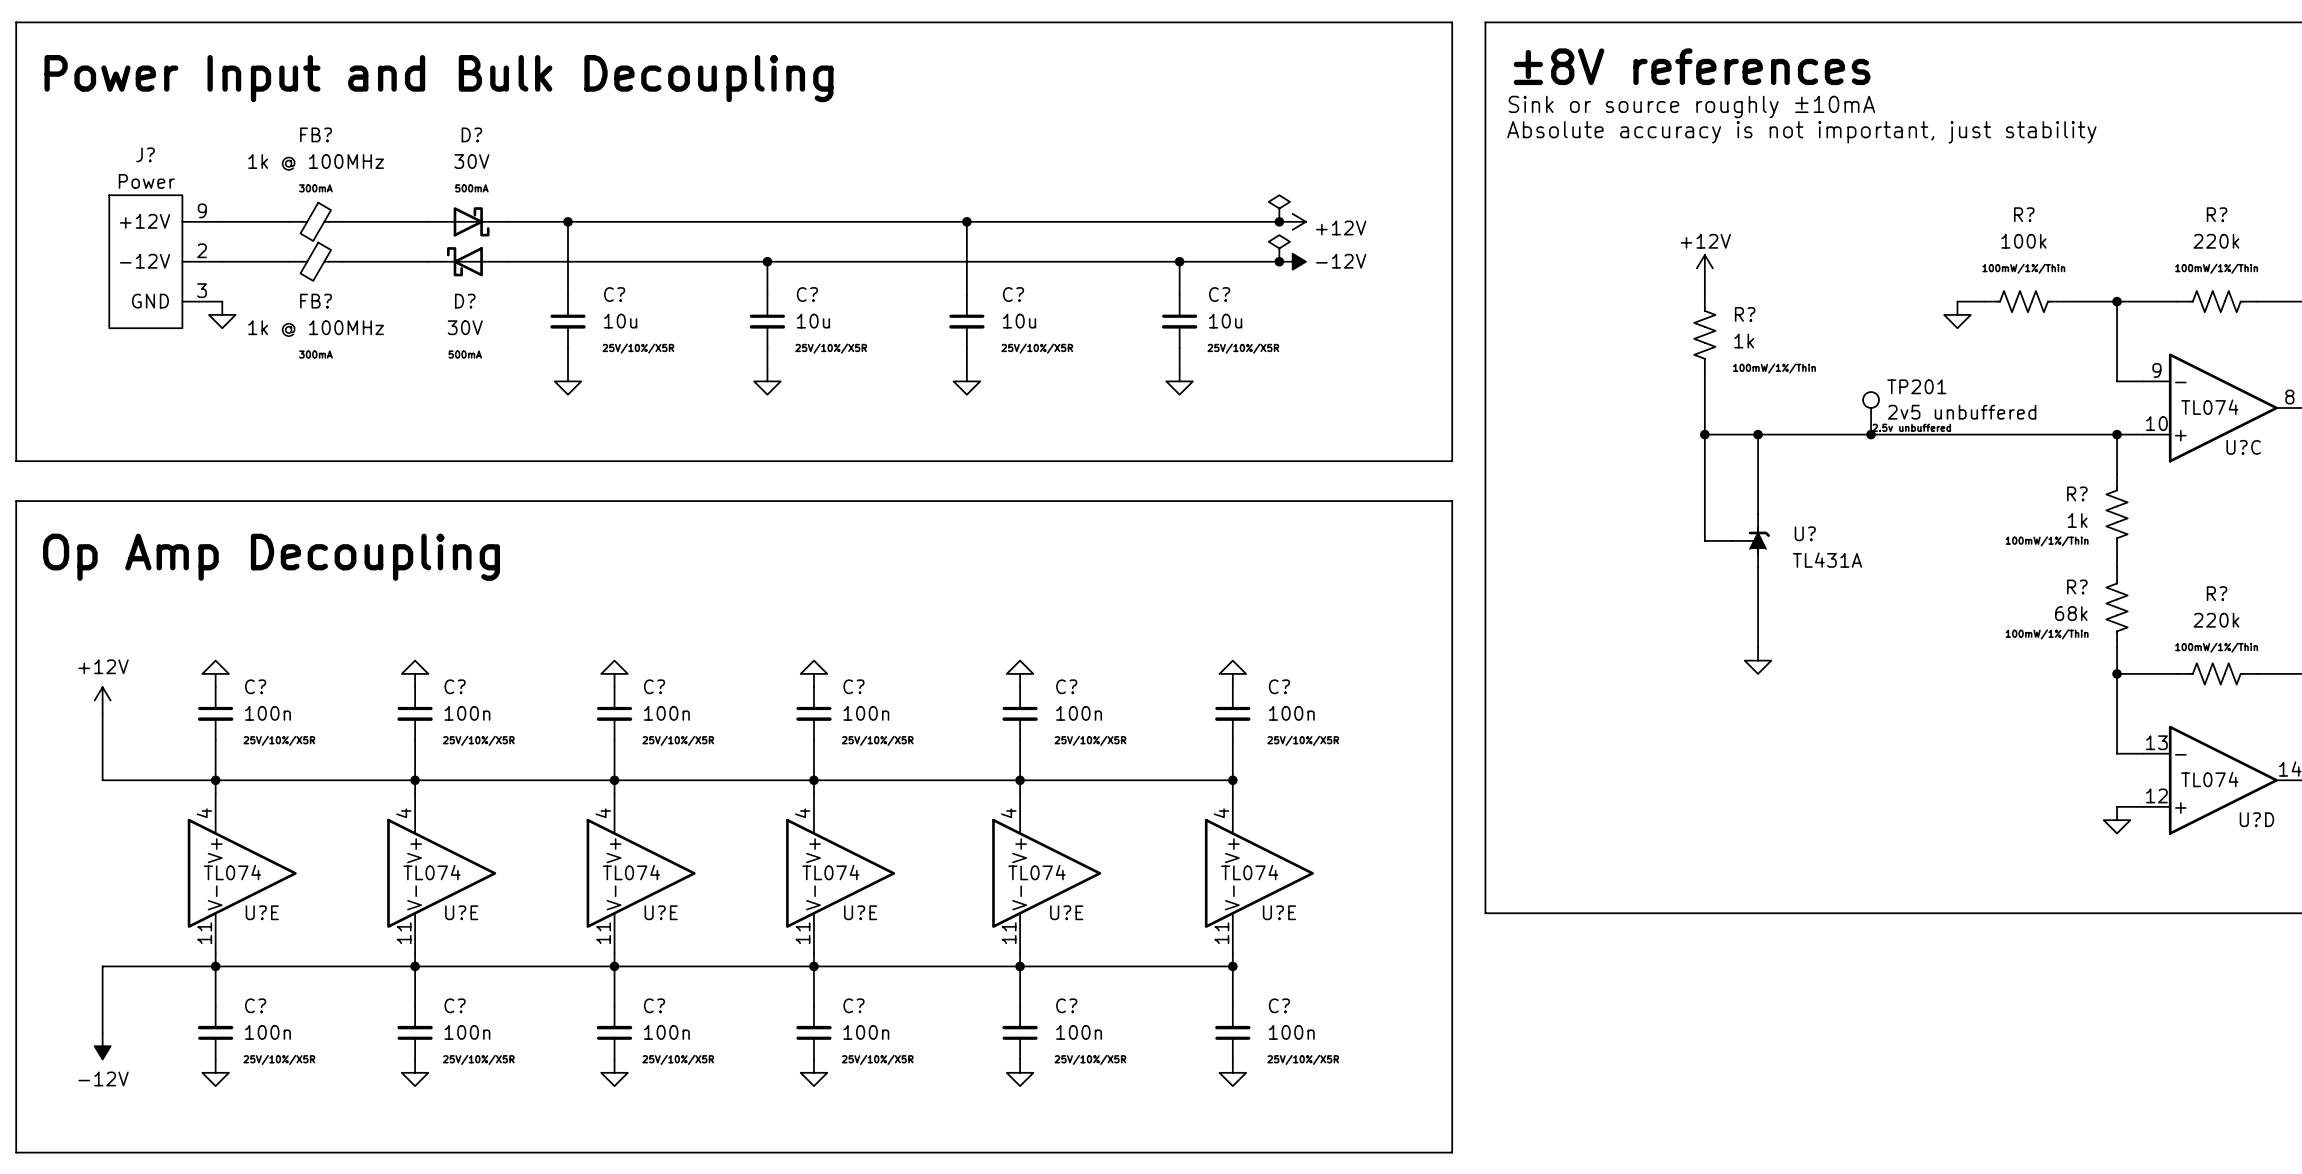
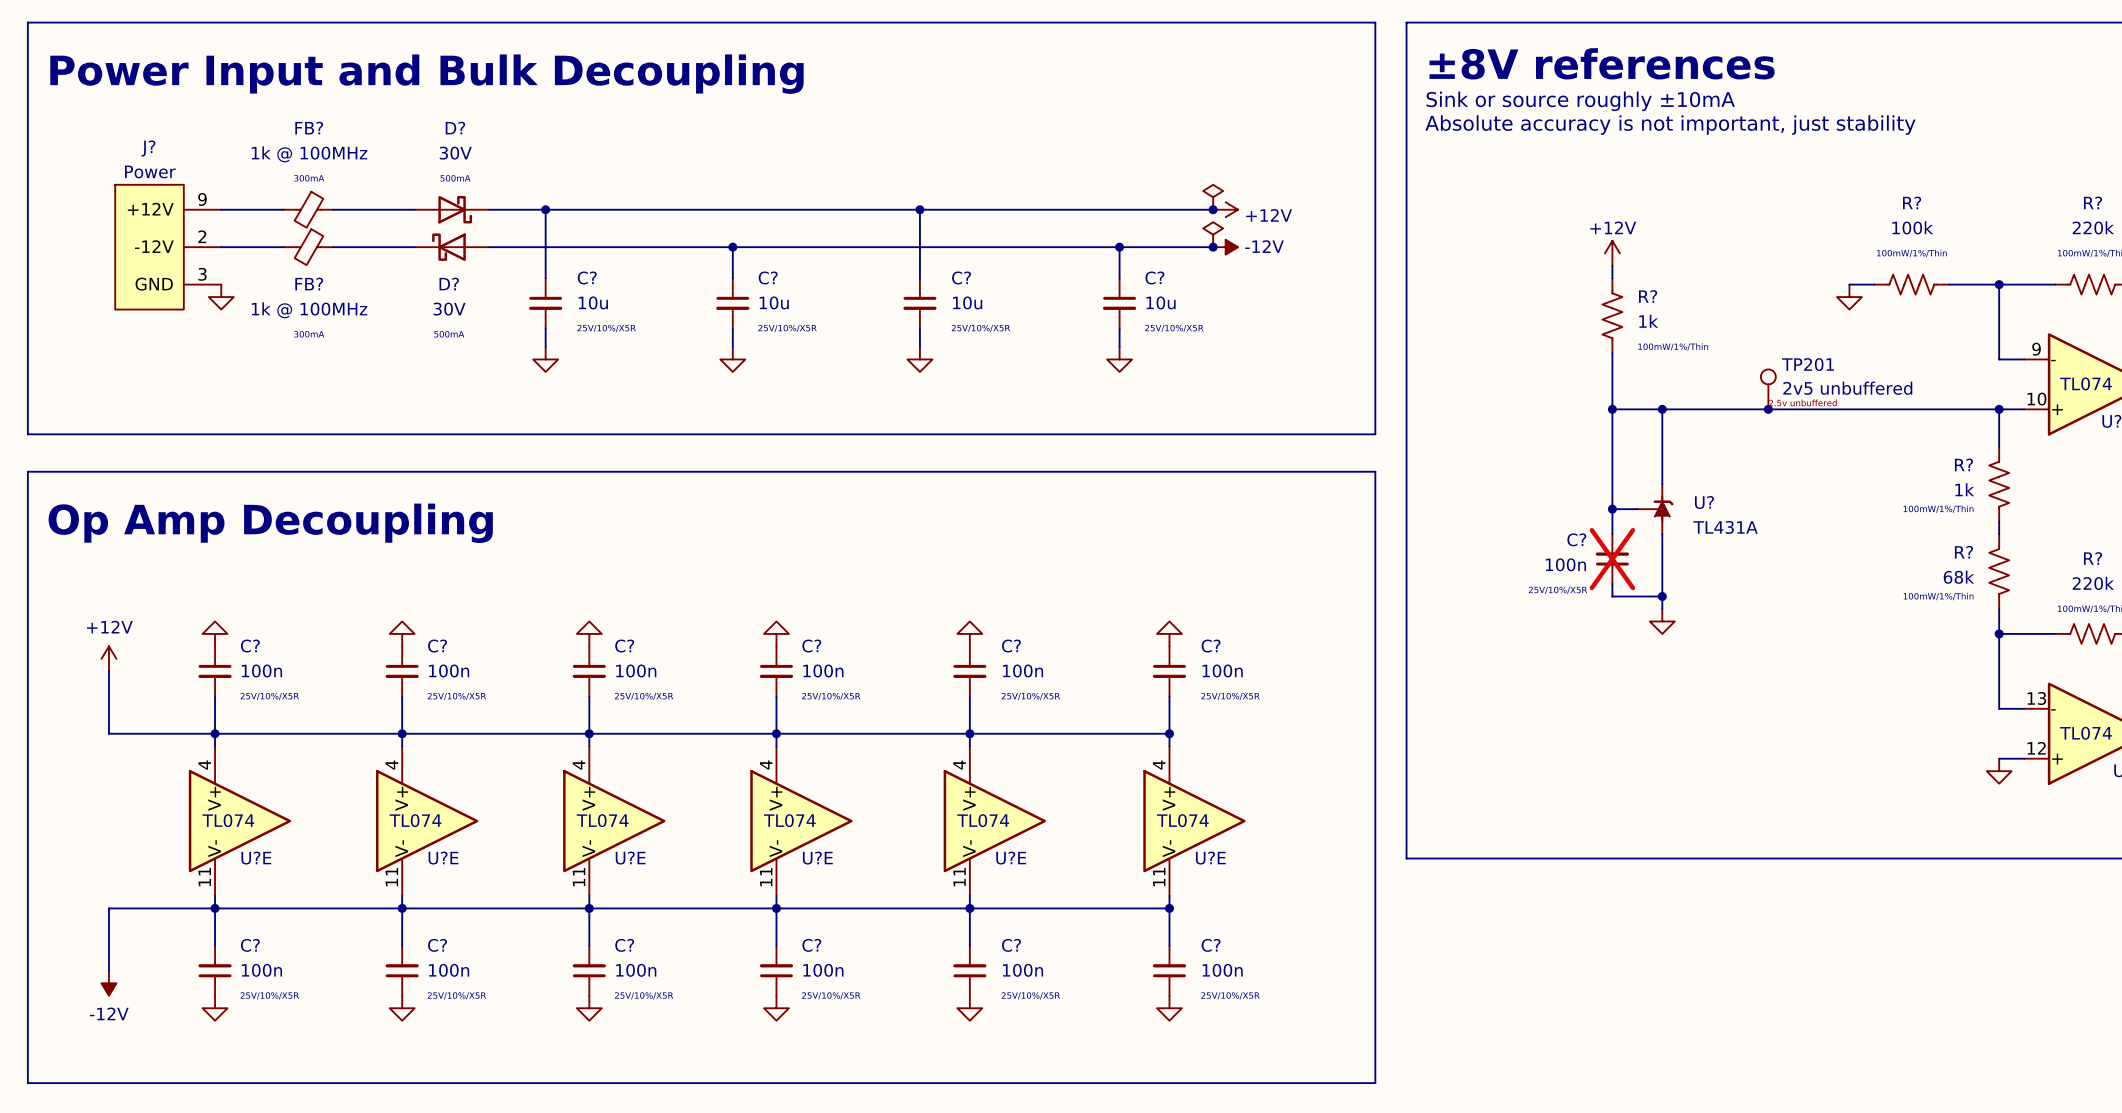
wire: none -> (1612, 509) (1612, 534)
junction: none -> (1612, 509)
C?: none -> 100n (1612, 559)
wire: none -> (1612, 584) (1612, 596) (1662, 596)
junction: none -> (1662, 596)

